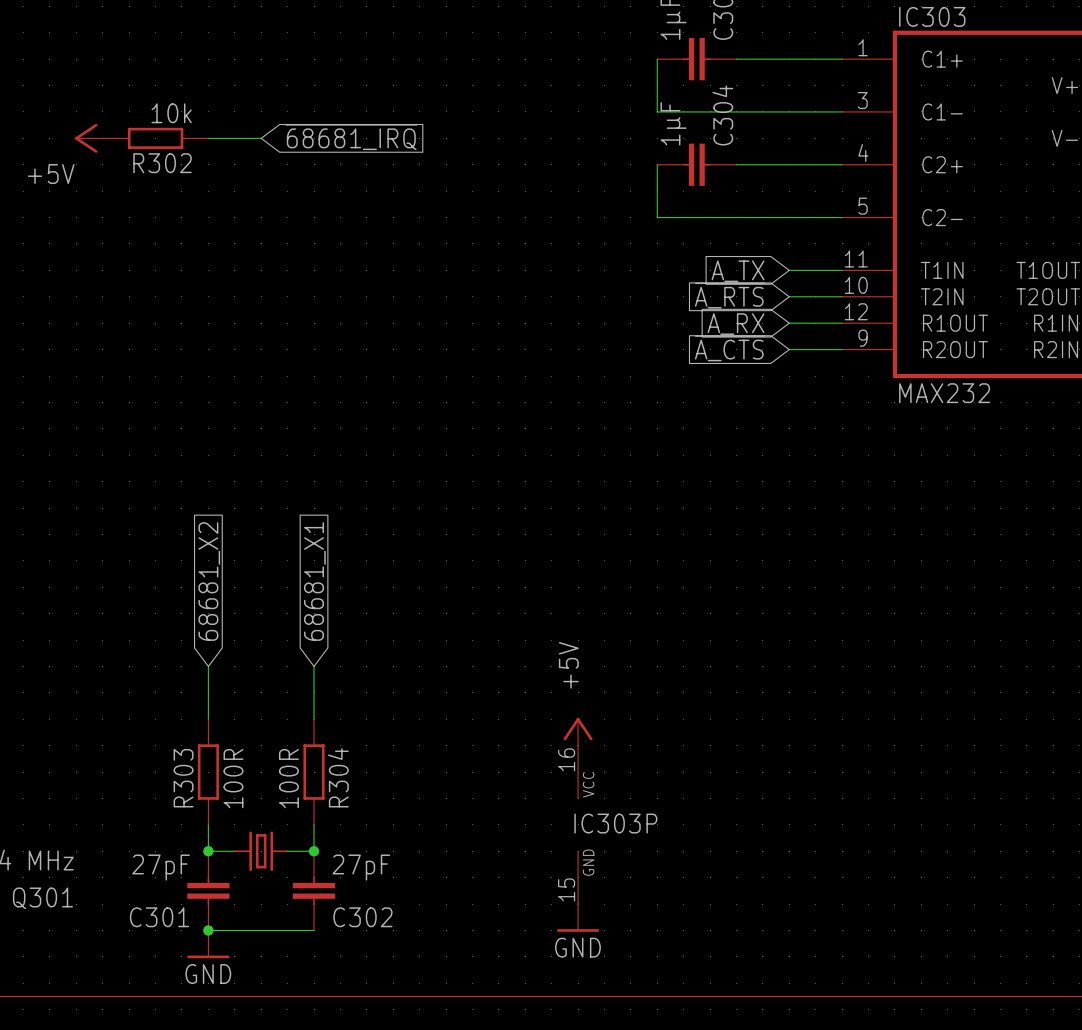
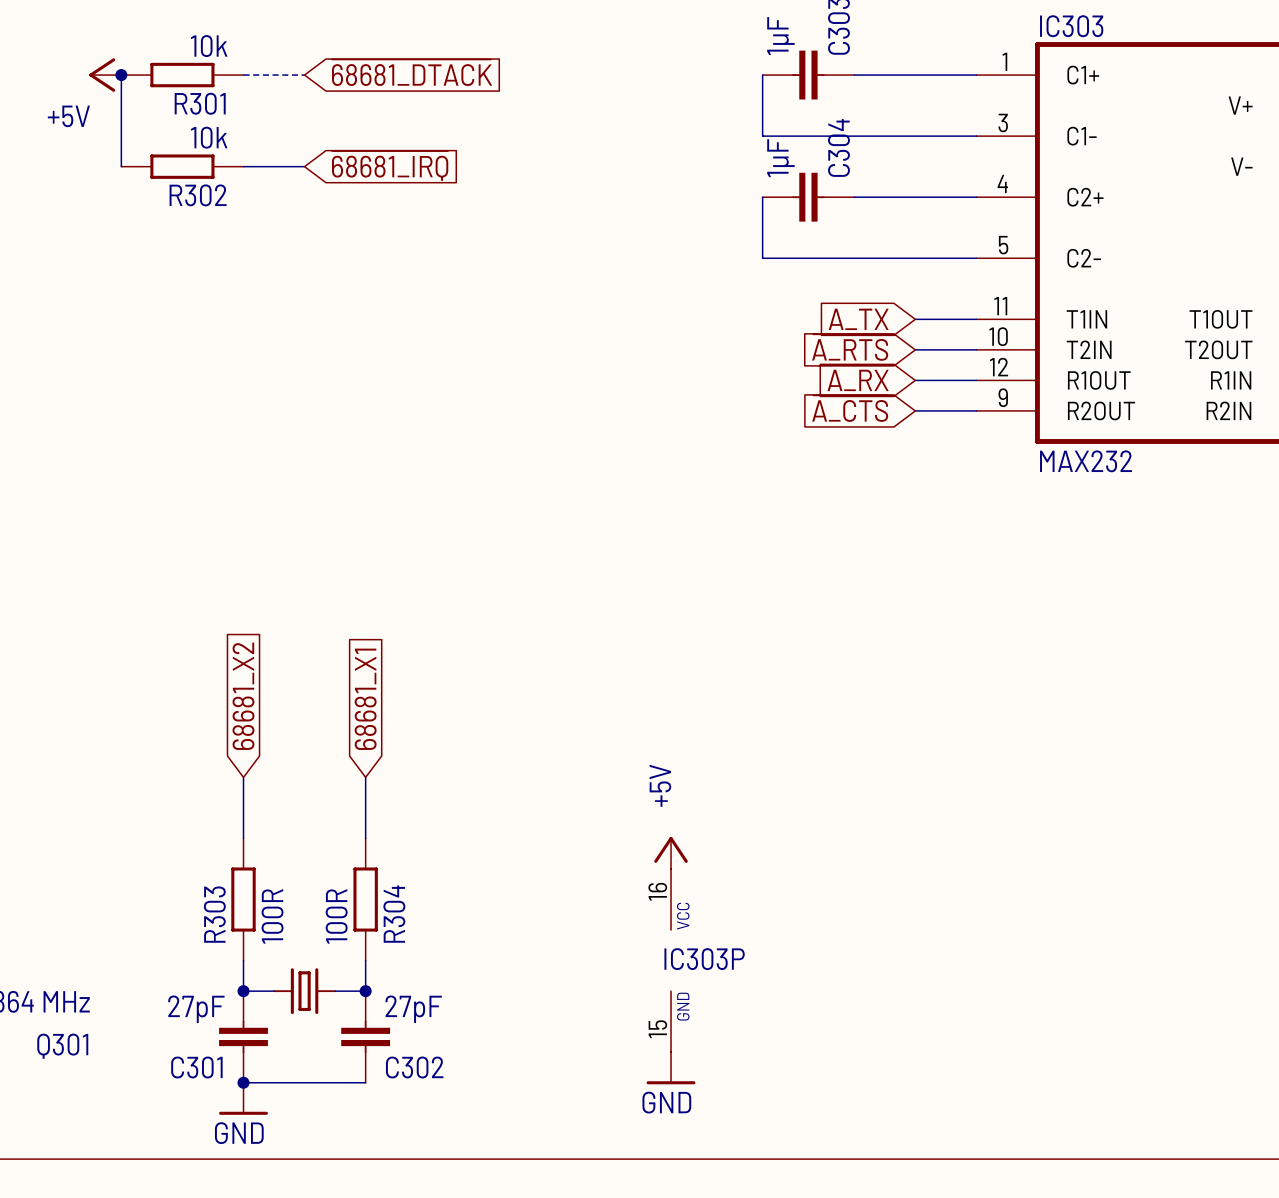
global label: none -> ~{68681_DTACK} (412, 72)
wire: none -> (121, 75) (121, 166)
junction: none -> (121, 75)
R301: none -> 10k (182, 75)
wire: none -> (243, 75) (304, 75)
power symbol position: +5V (88, 138) -> +5V (105, 75)

